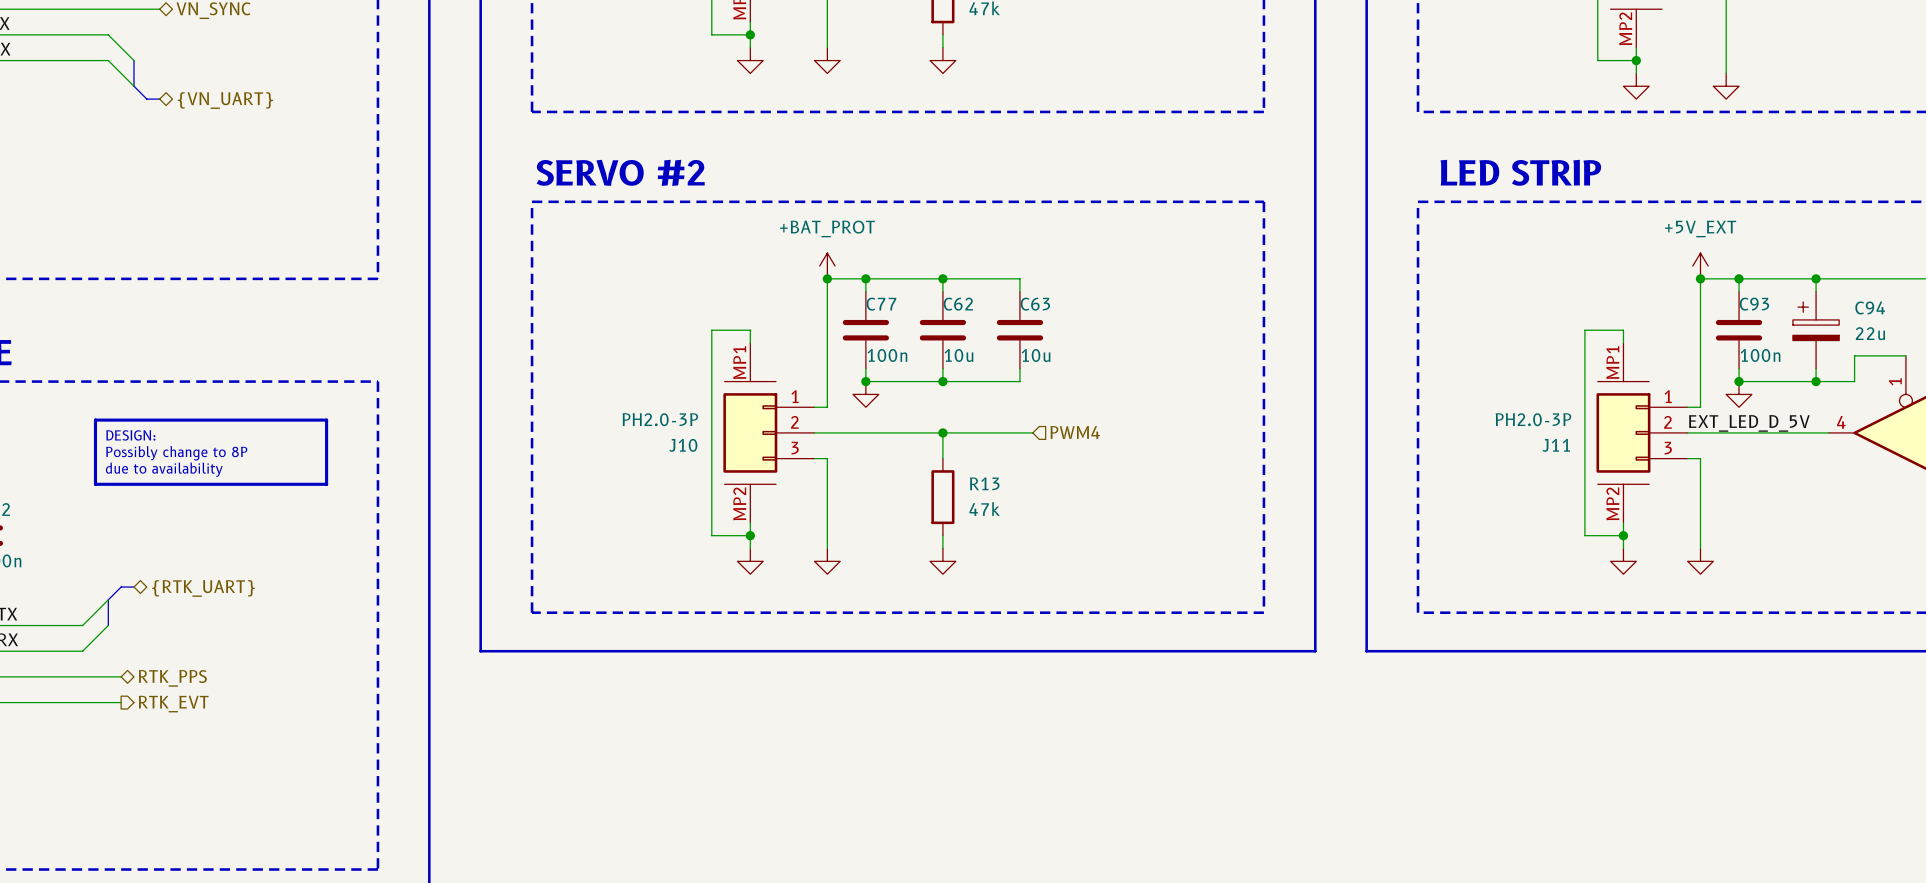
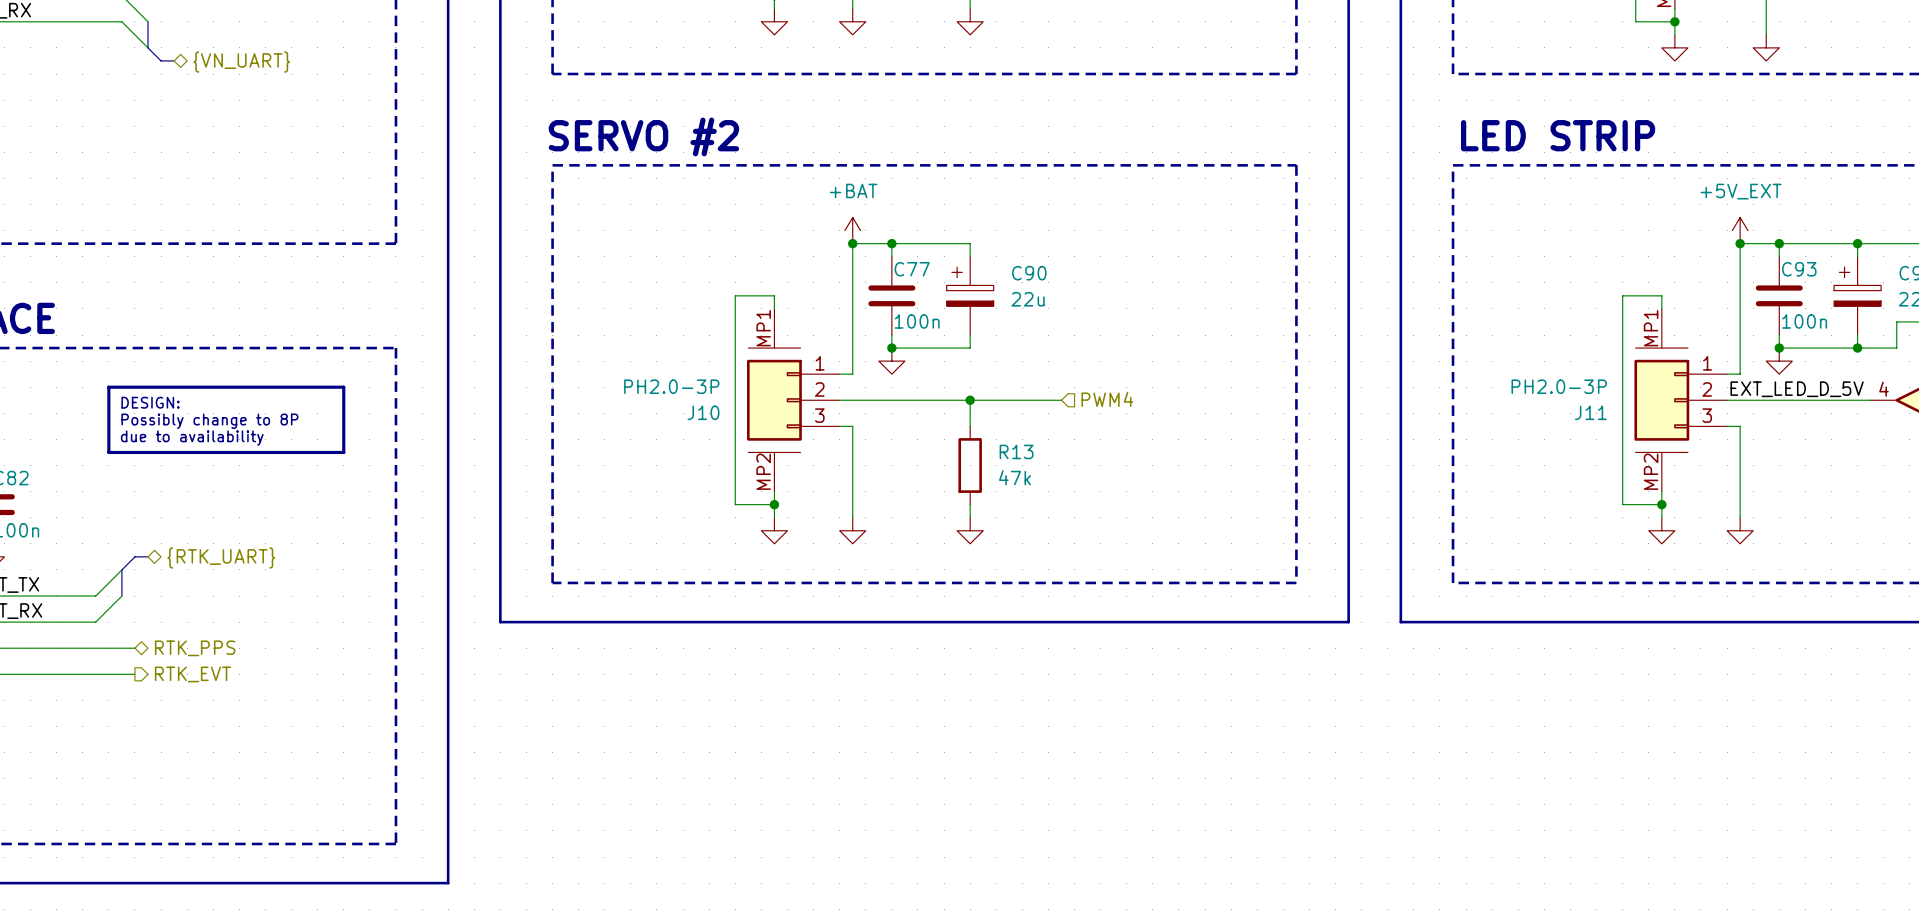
power symbol: +BAT_PROT (827, 266) -> +BAT (852, 230)
wire: (942, 278) (1019, 278) (1019, 291) -> none
junction: (942, 278) -> none
C62: 10u (942, 330) -> none
C90: none -> 22u (970, 295)
C63: 10u (1019, 330) -> none
wire: (1019, 368) (1019, 381) (942, 381) -> none
junction: (942, 381) -> none

